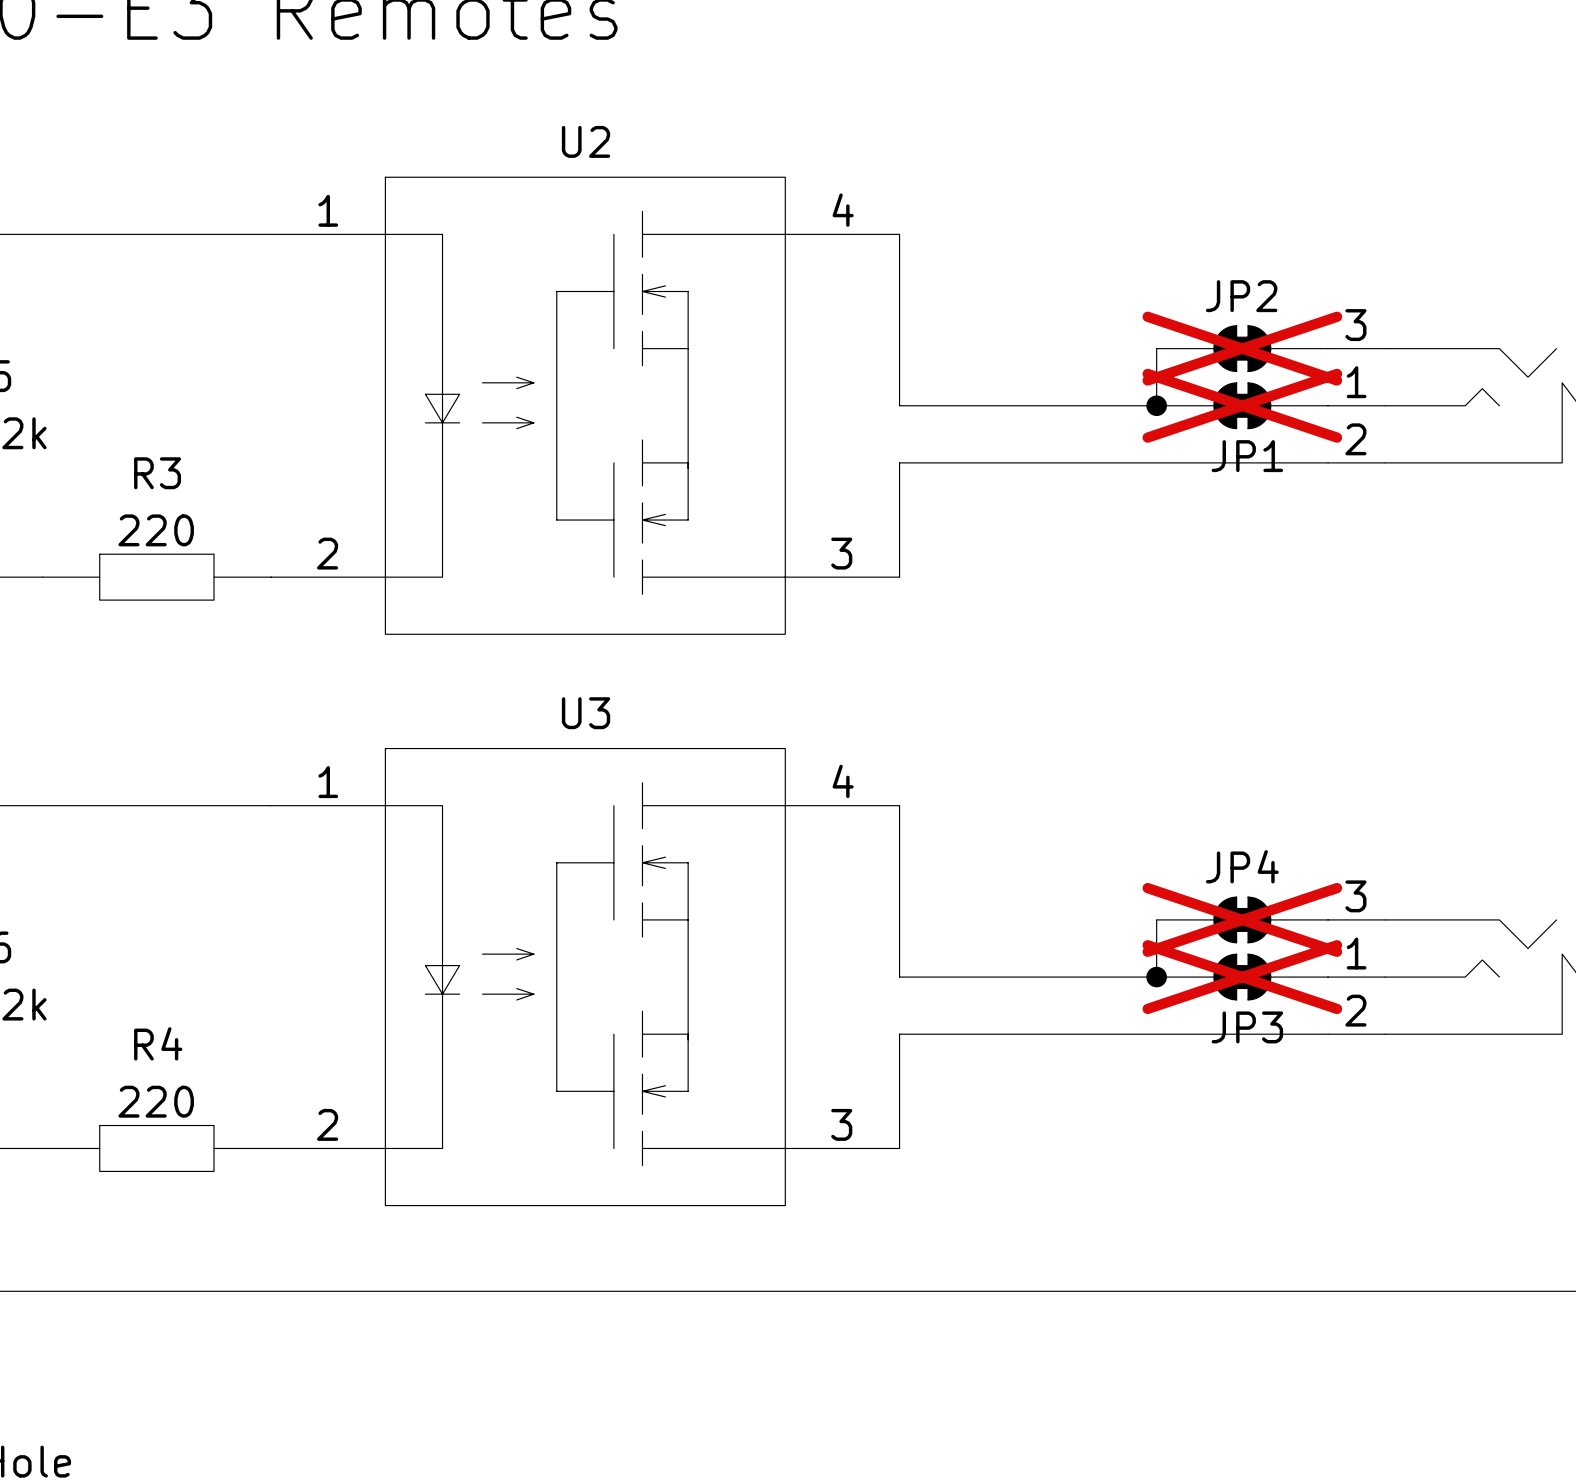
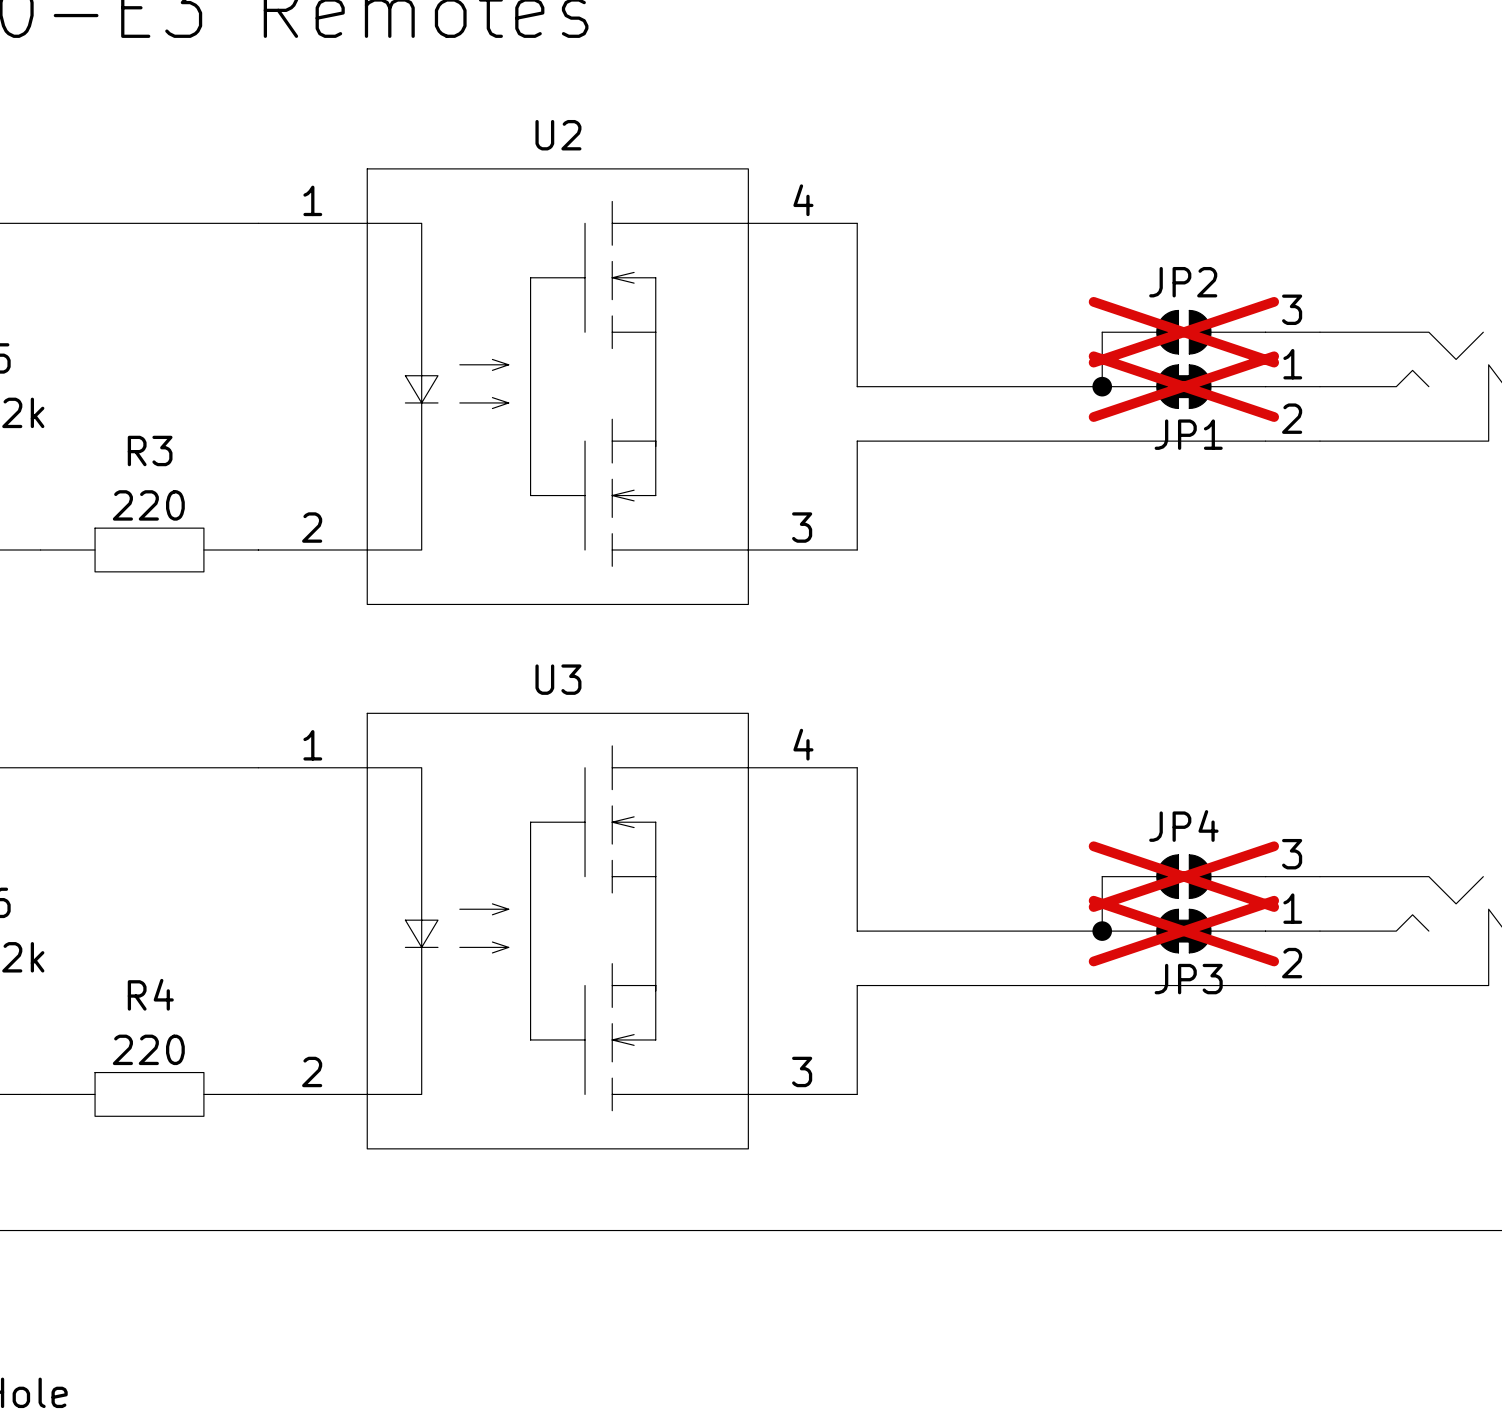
JP2 symbol: [1156, 325, 1329, 372] -> [1102, 310, 1266, 355]
JP4 symbol: [1156, 897, 1329, 943] -> [1102, 854, 1266, 899]

